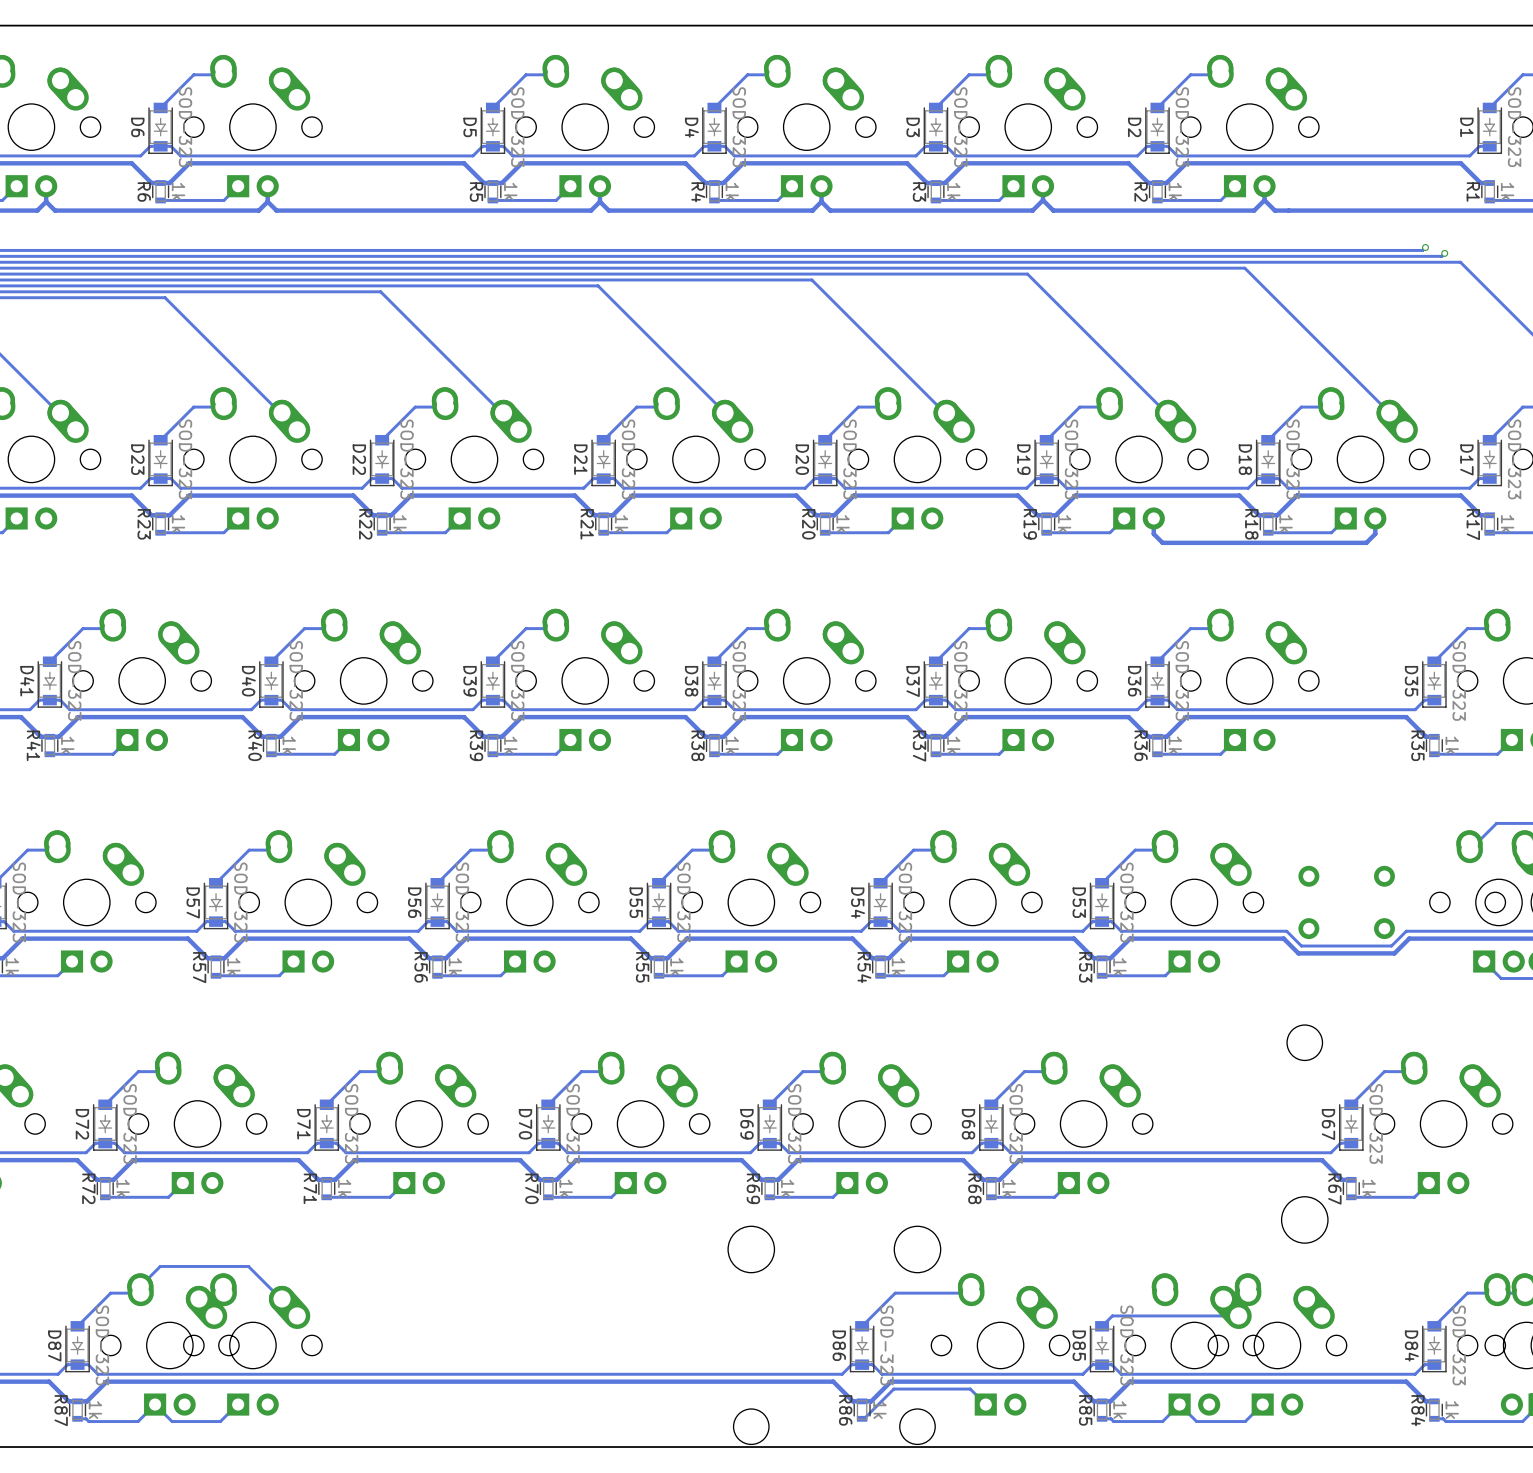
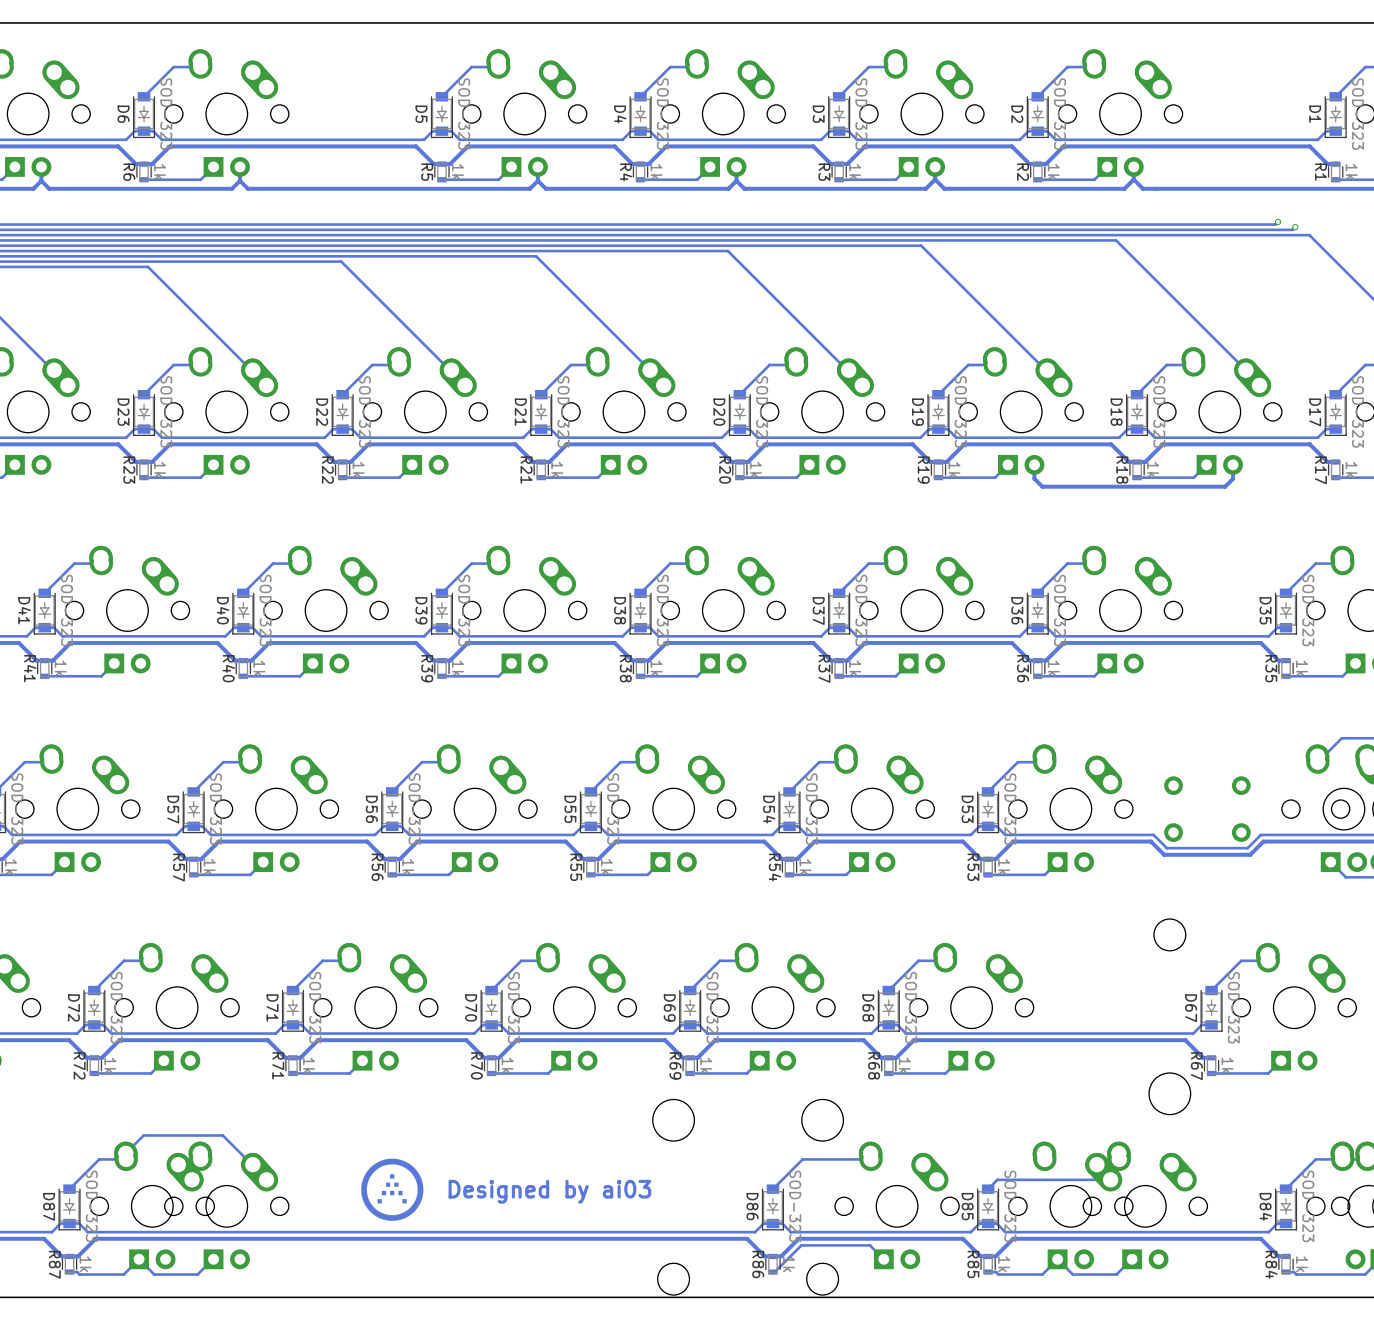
drawing: none -> [361, 1158, 424, 1221]
text: none -> Designed by ai03 (549, 1191)

